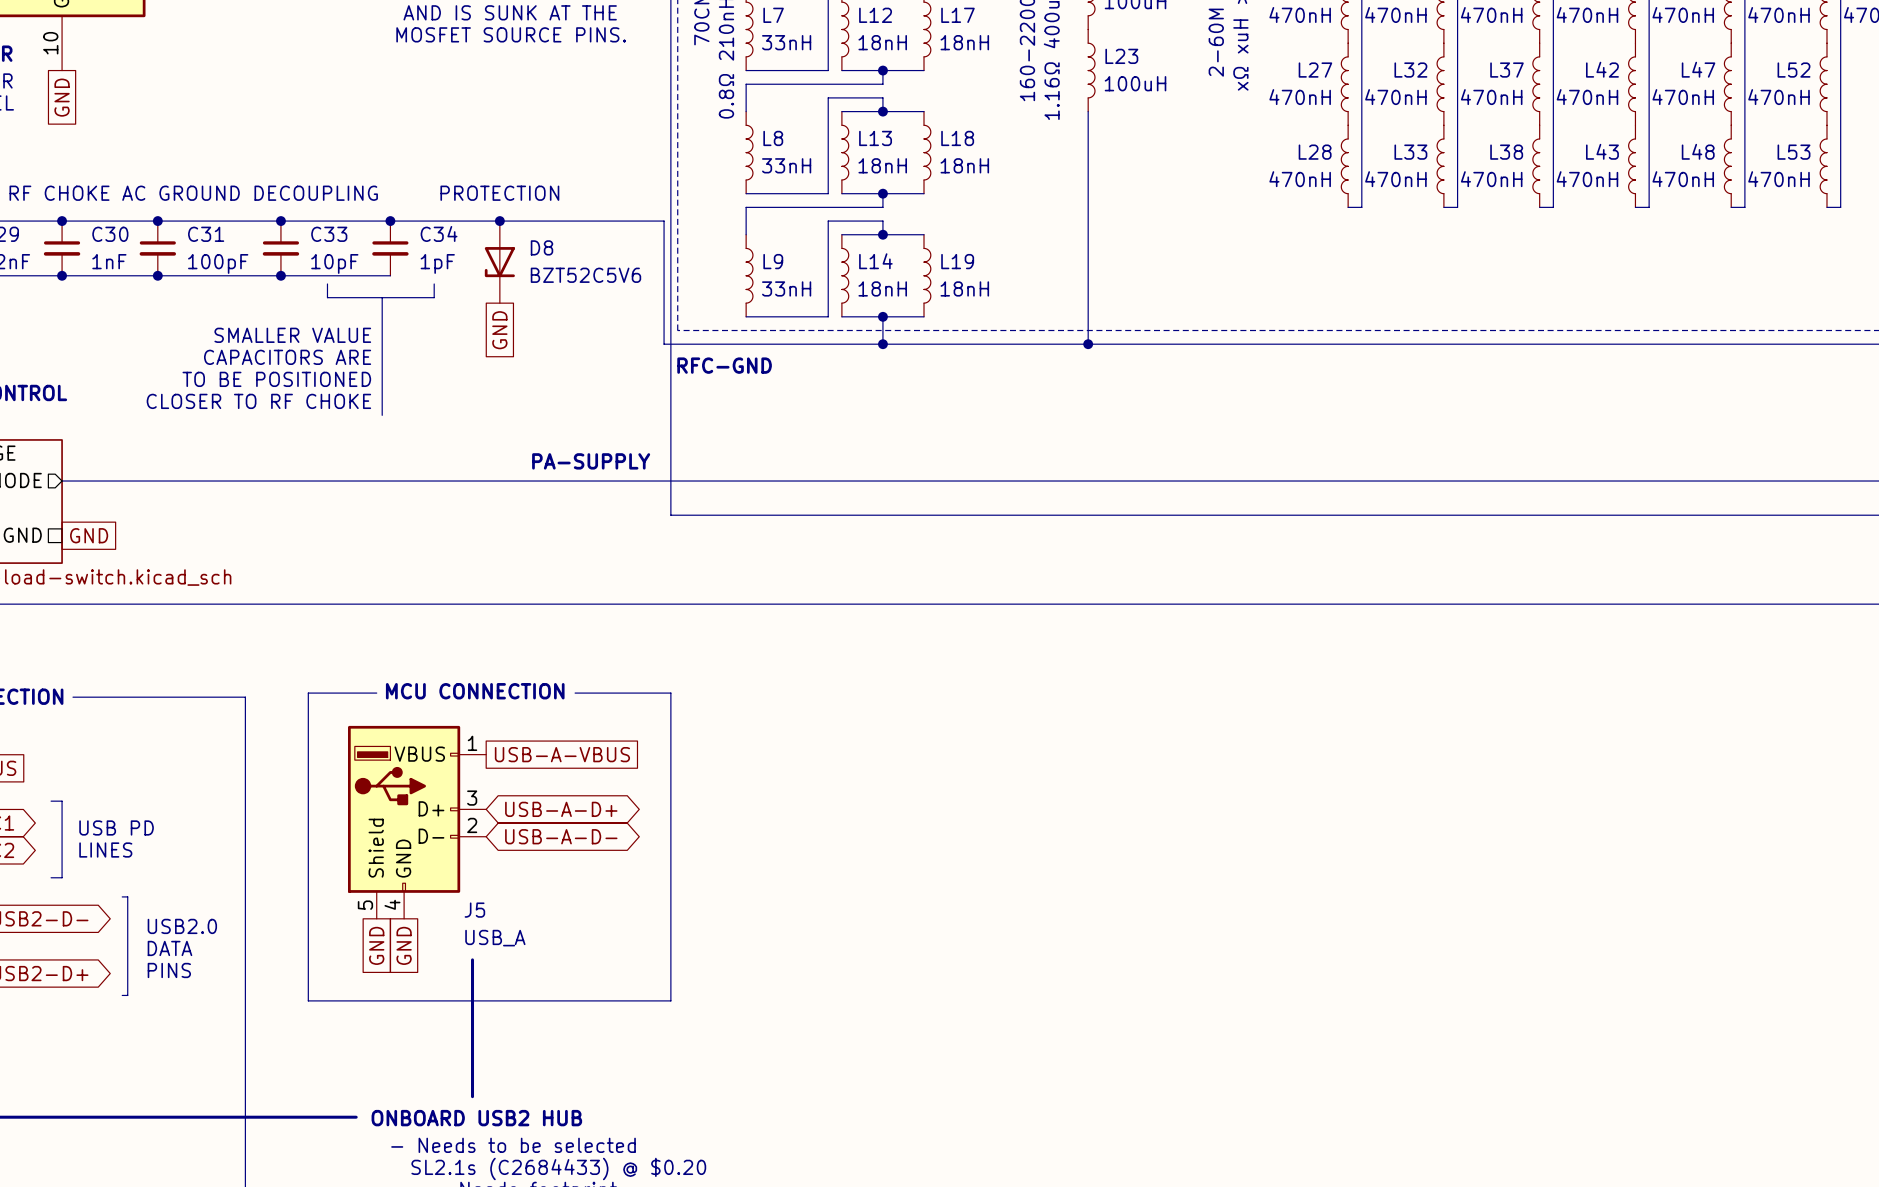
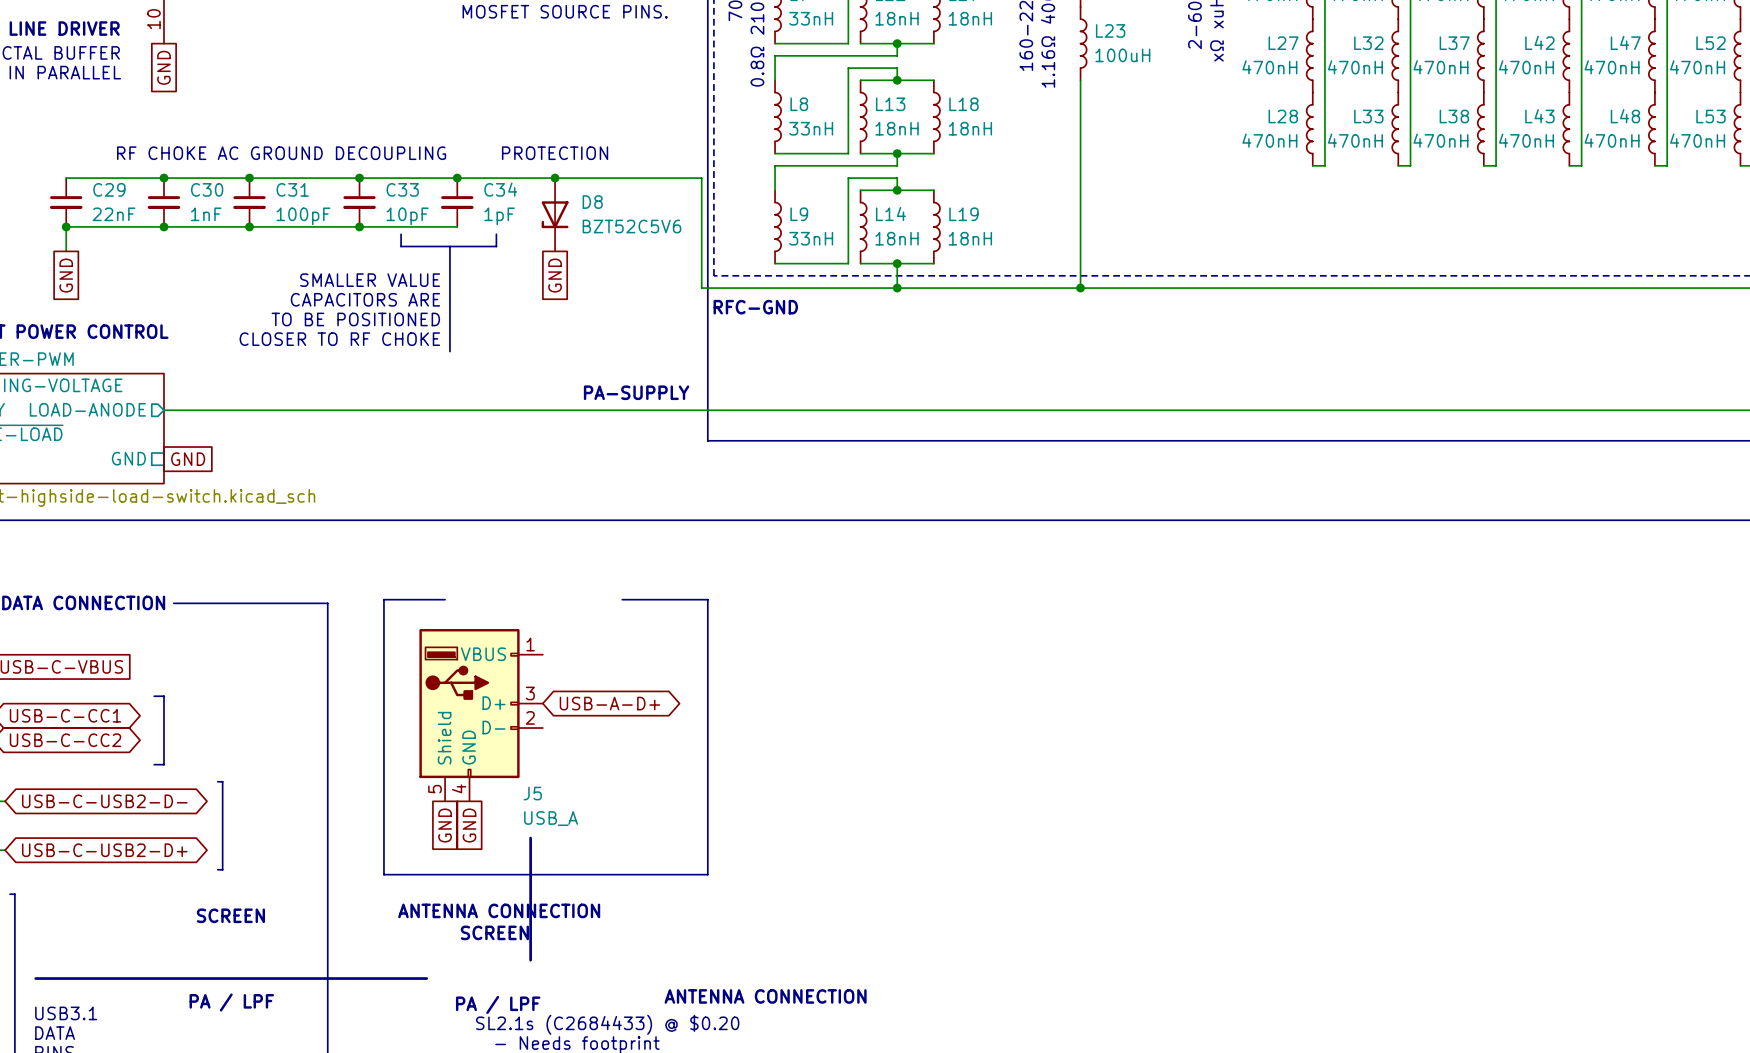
text: MCU CONNECTION (475, 691) -> none
global label: USB-A-VBUS (562, 754) -> none
text: USB PD (116, 827) -> none
global label: USB-A-D- (561, 836) -> none
text: LINES (105, 850) -> none
text: USB2.0 (182, 926) -> none
text: DATA (169, 948) -> none
text: PINS (169, 970) -> none
text: none -> ANTENNA CONNECTION (499, 910)
text: none -> SCREEN (230, 915)
text: none -> SCREEN (494, 932)
text: ONBOARD USB2 HUB (476, 1118) -> none
text: none -> ANTENNA CONNECTION (765, 996)
text: none -> PA / LPF (231, 1002)
text: - Needs to be selected (513, 1145) -> none
text: none -> PA / LPF (498, 1004)

